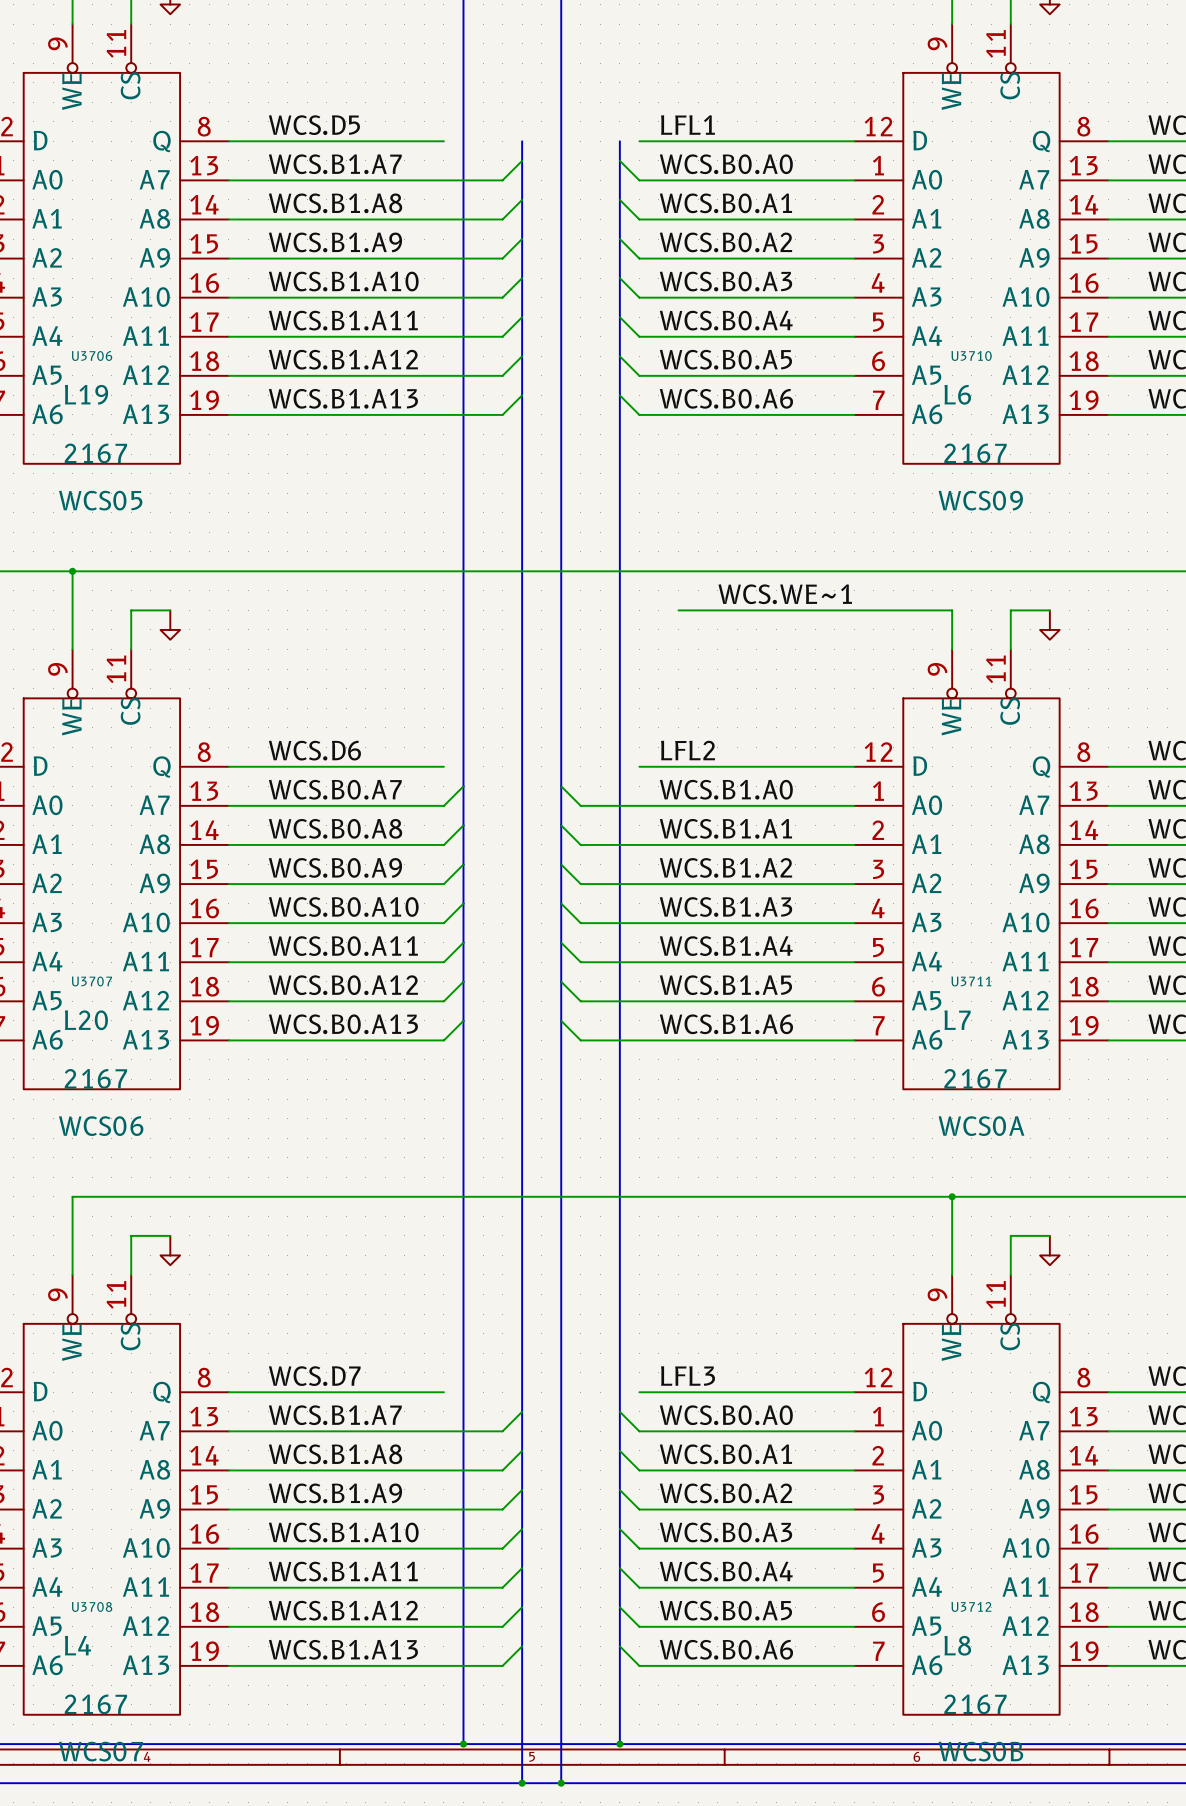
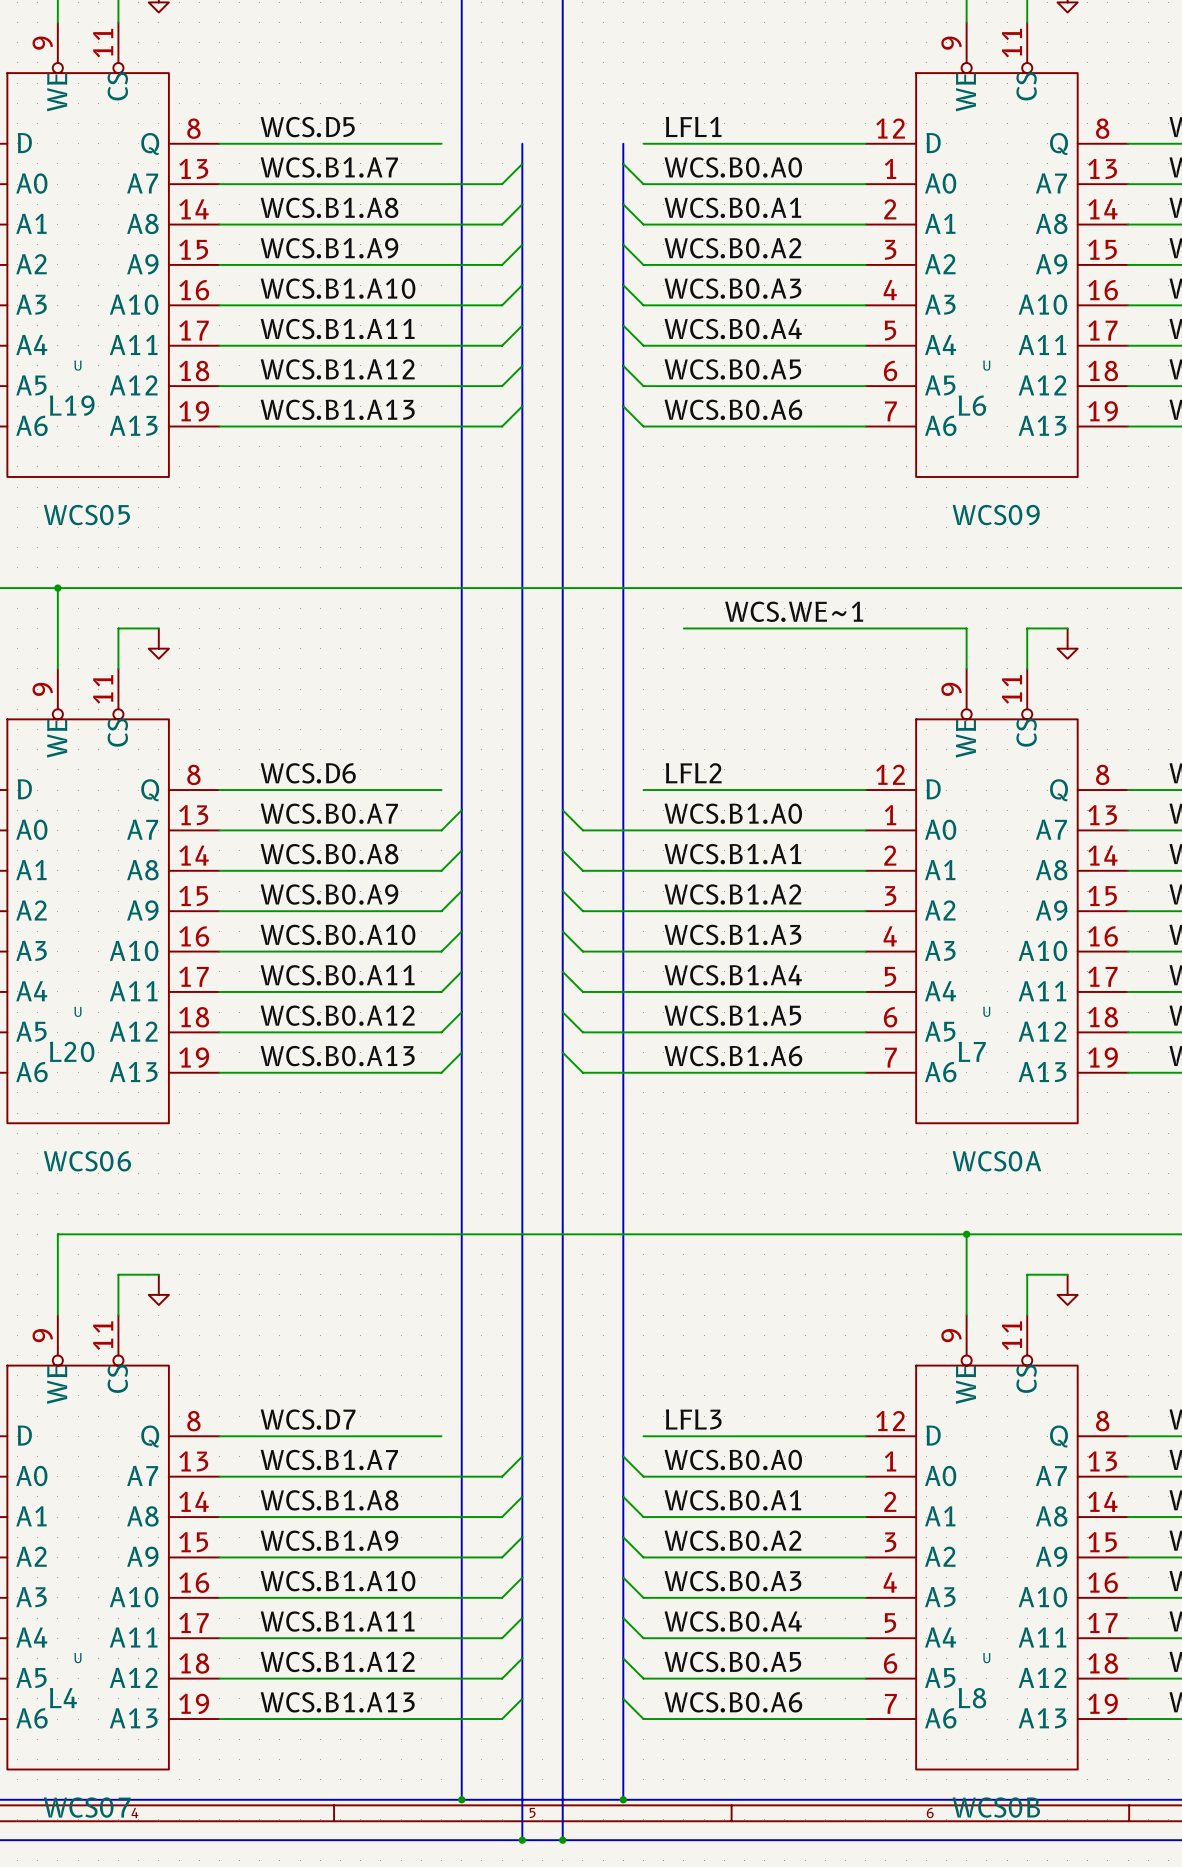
U3706 name: U3706 (92, 355) -> U (77, 365)
U3710 name: U3710 (971, 355) -> U (986, 365)
U3706 value: 2167 (95, 453) -> none
U3710 value: 2167 (975, 453) -> none
U3707 name: U3707 (91, 981) -> U (77, 1011)
U3711 name: U3711 (971, 981) -> U (986, 1011)
U3707 value: 2167 (95, 1078) -> none
U3711 value: 2167 (975, 1078) -> none
U3708 name: U3708 (92, 1606) -> U (77, 1658)
U3712 name: U3712 (971, 1606) -> U (986, 1658)
U3708 value: 2167 (95, 1704) -> none
U3712 value: 2167 (975, 1704) -> none

